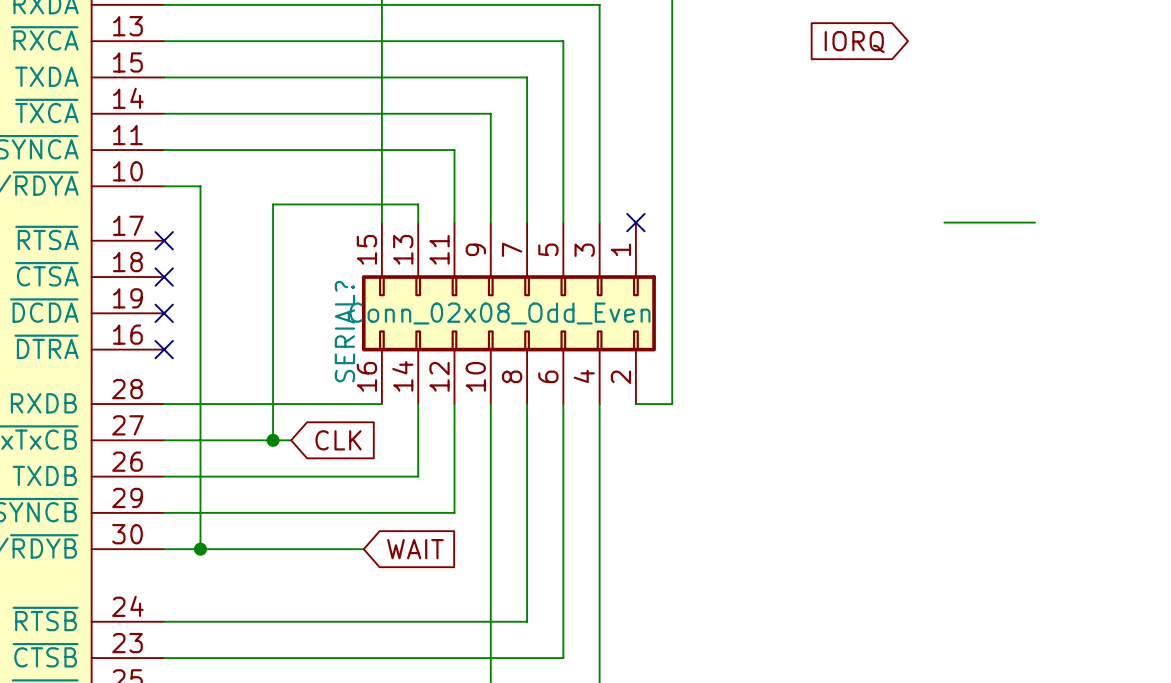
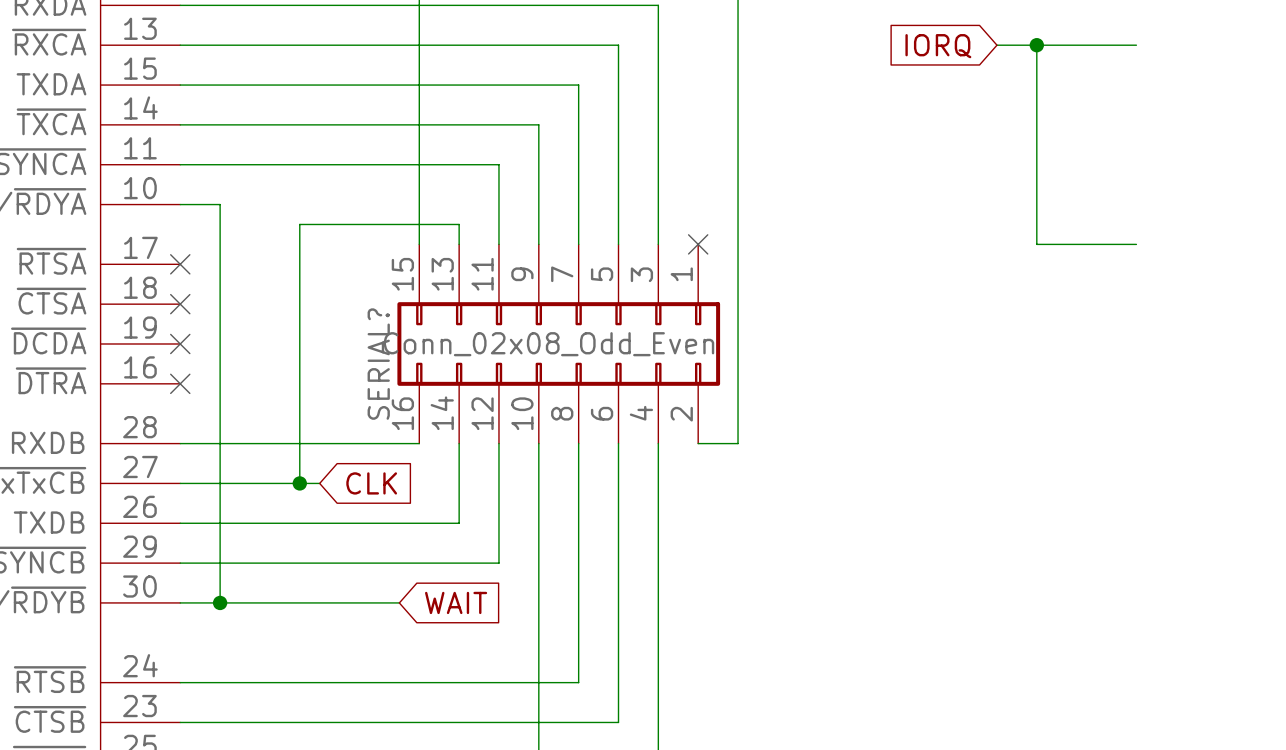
wire: none -> (996, 45) (1136, 45)
wire: none -> (1036, 45) (1036, 244)
junction: none -> (1036, 45)

